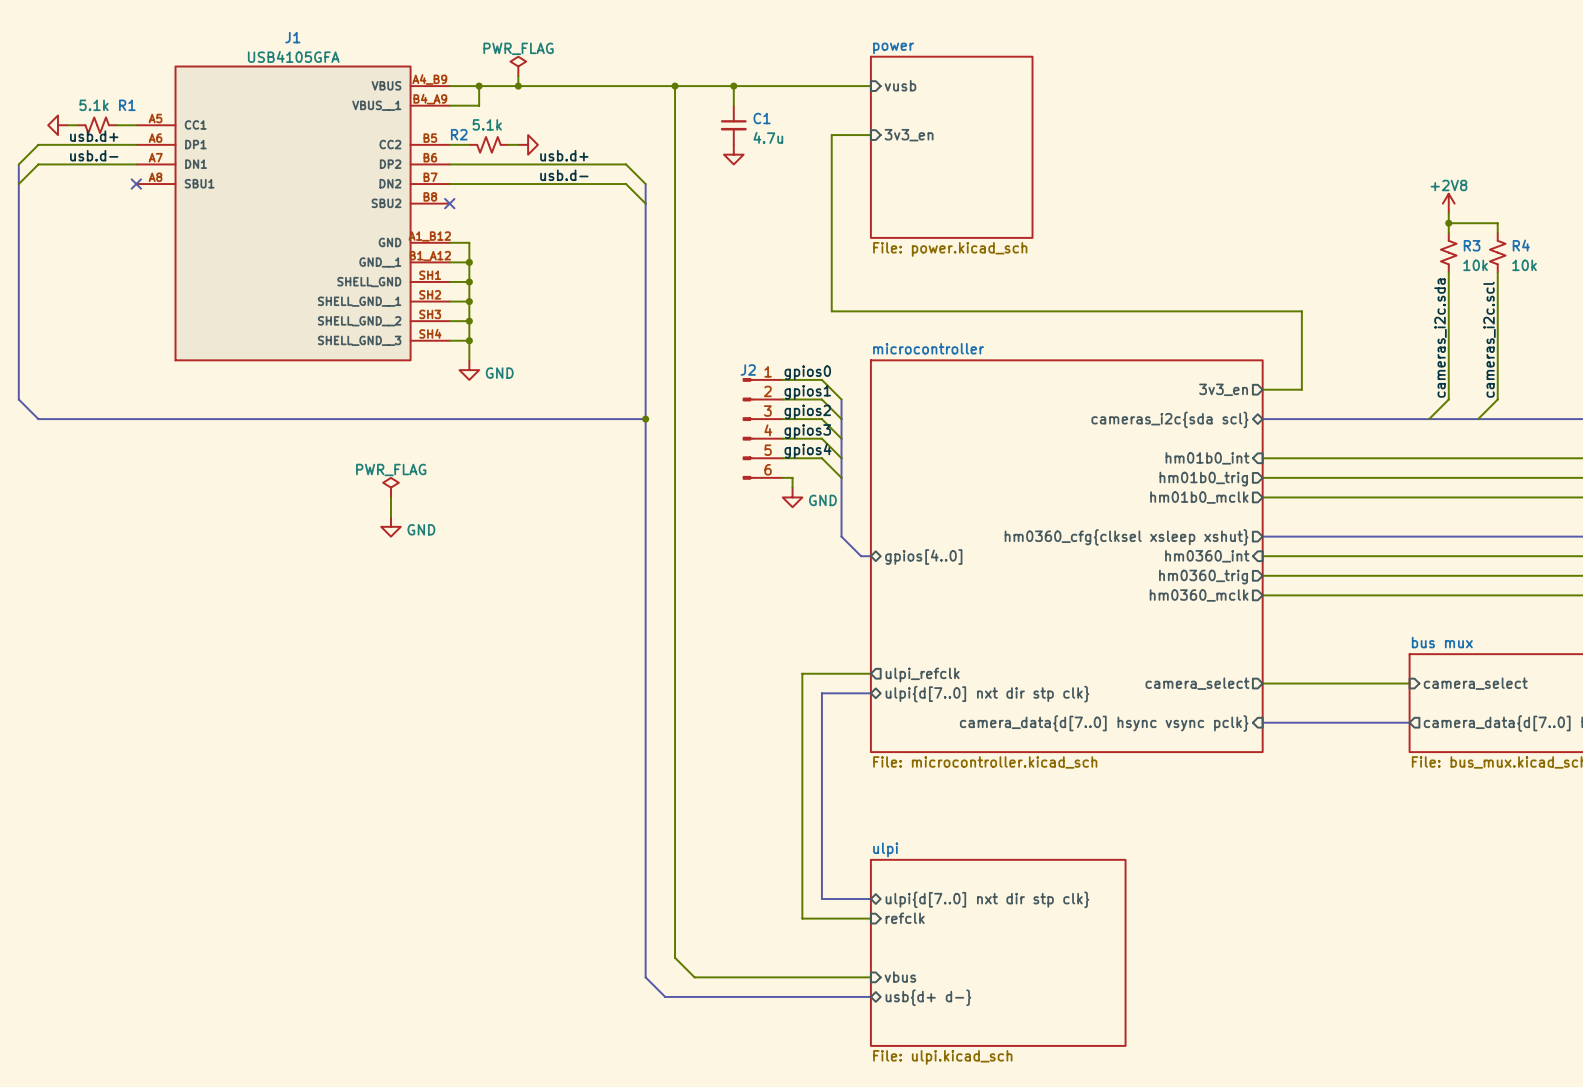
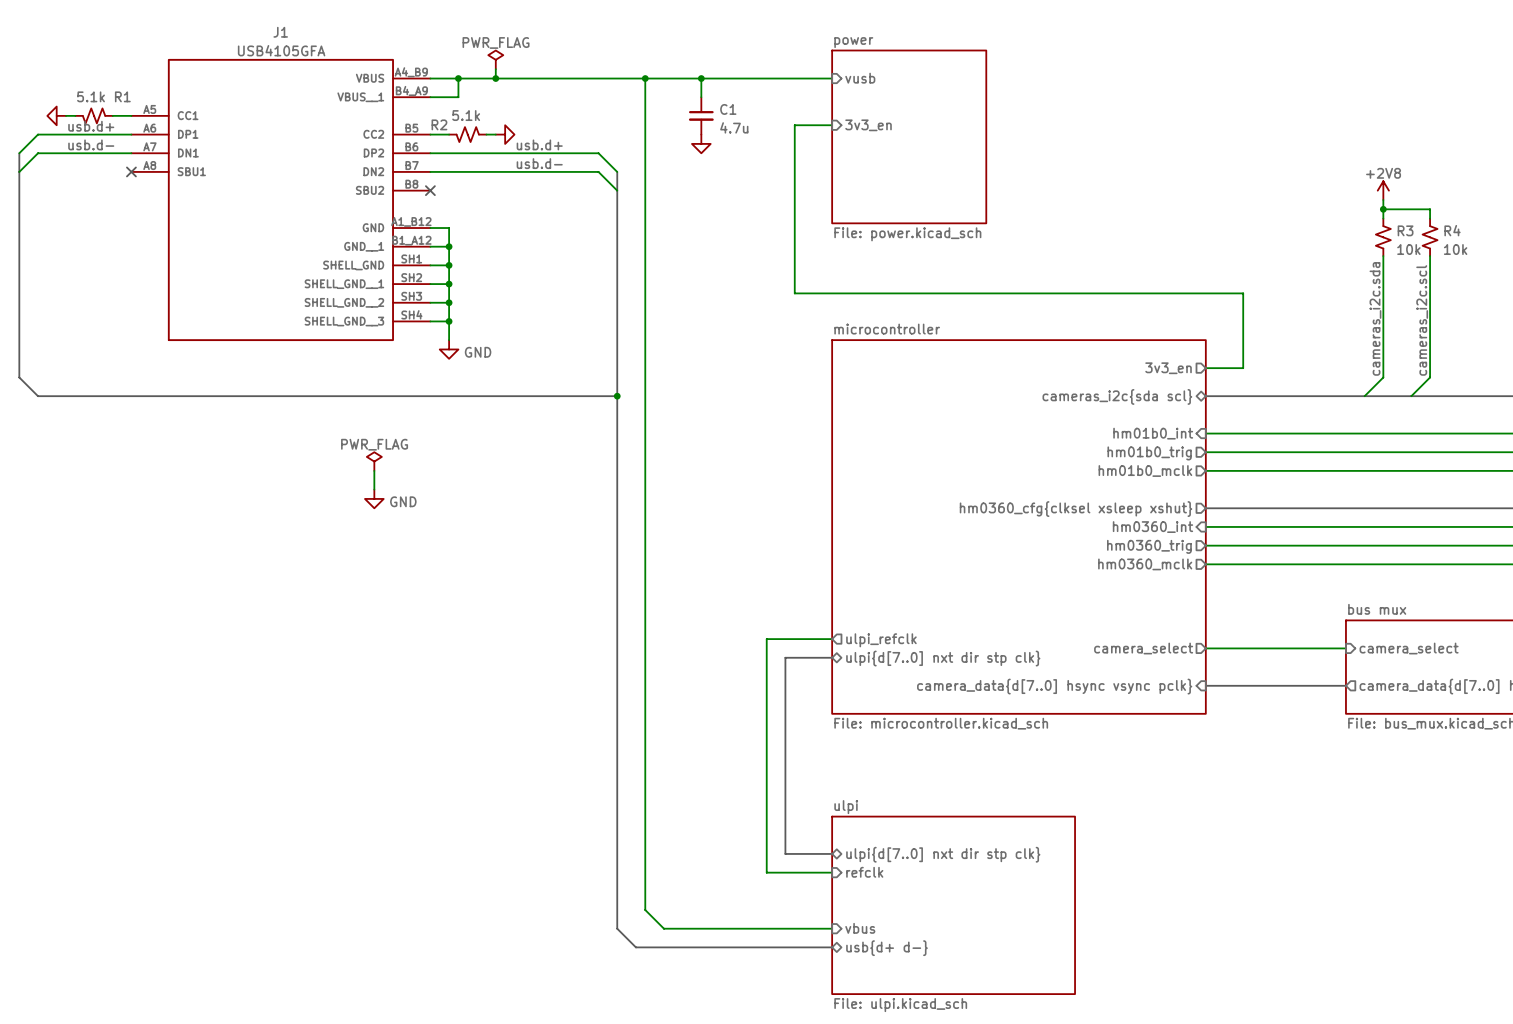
label: gpios0 (807, 372) -> none
wire: (782, 379) (821, 379) (841, 399) -> none
label: gpios1 (807, 392) -> none
wire: (782, 399) (821, 399) (841, 419) -> none
bus: (841, 399) (841, 536) (861, 556) (870, 556) -> none
label: gpios2 (807, 411) -> none
wire: (782, 419) (821, 419) (841, 438) -> none
J2: (762, 428) -> none
label: gpios3 (807, 431) -> none
wire: (782, 438) (821, 438) (841, 458) -> none
label: gpios4 (808, 450) -> none
wire: (782, 458) (821, 458) (841, 477) -> none
wire: (782, 477) (792, 477) (792, 487) -> none
power symbol: GND (792, 497) -> none
sheet pin: gpios[4..0] (923, 557) -> none

